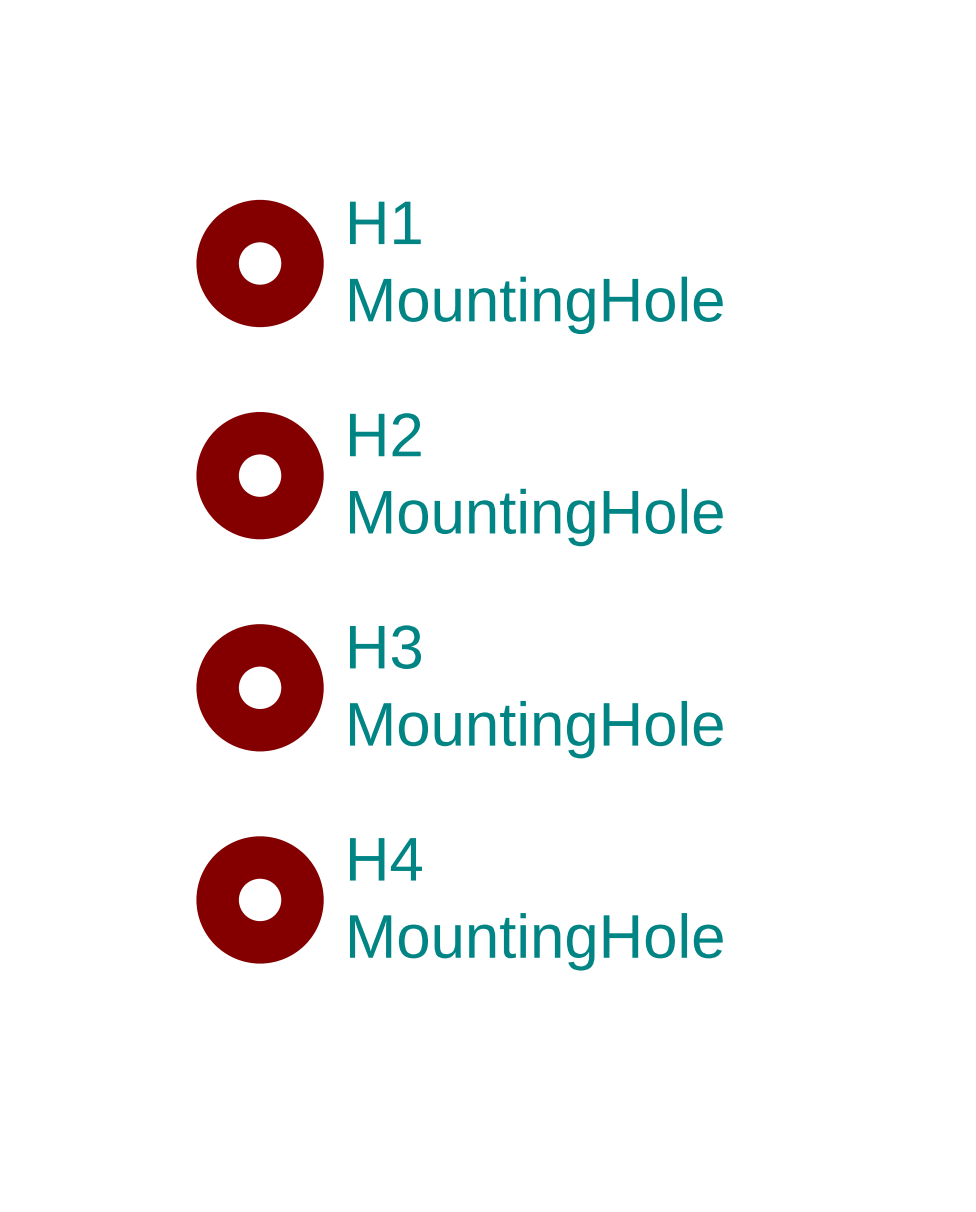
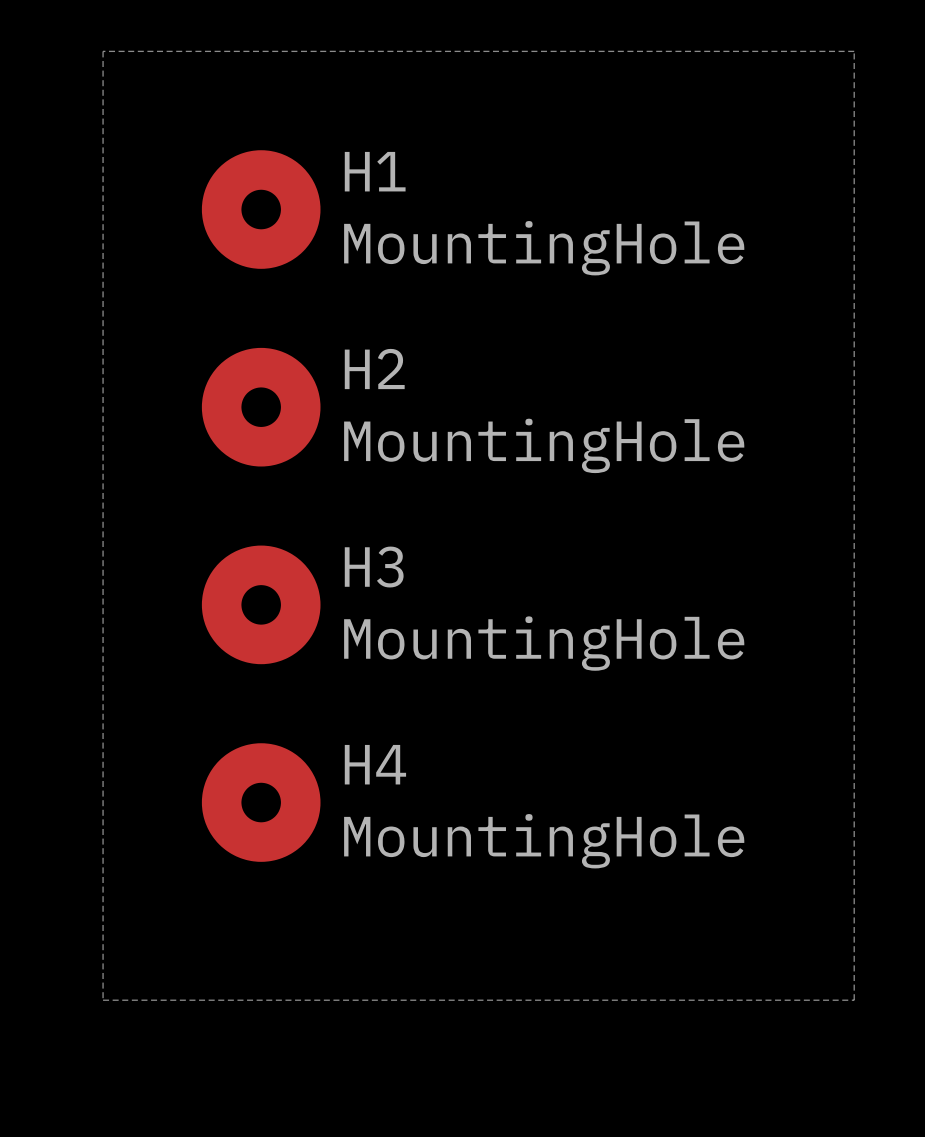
line: none -> (103, 51) (854, 51) (854, 1000) (103, 1000) (103, 51)

